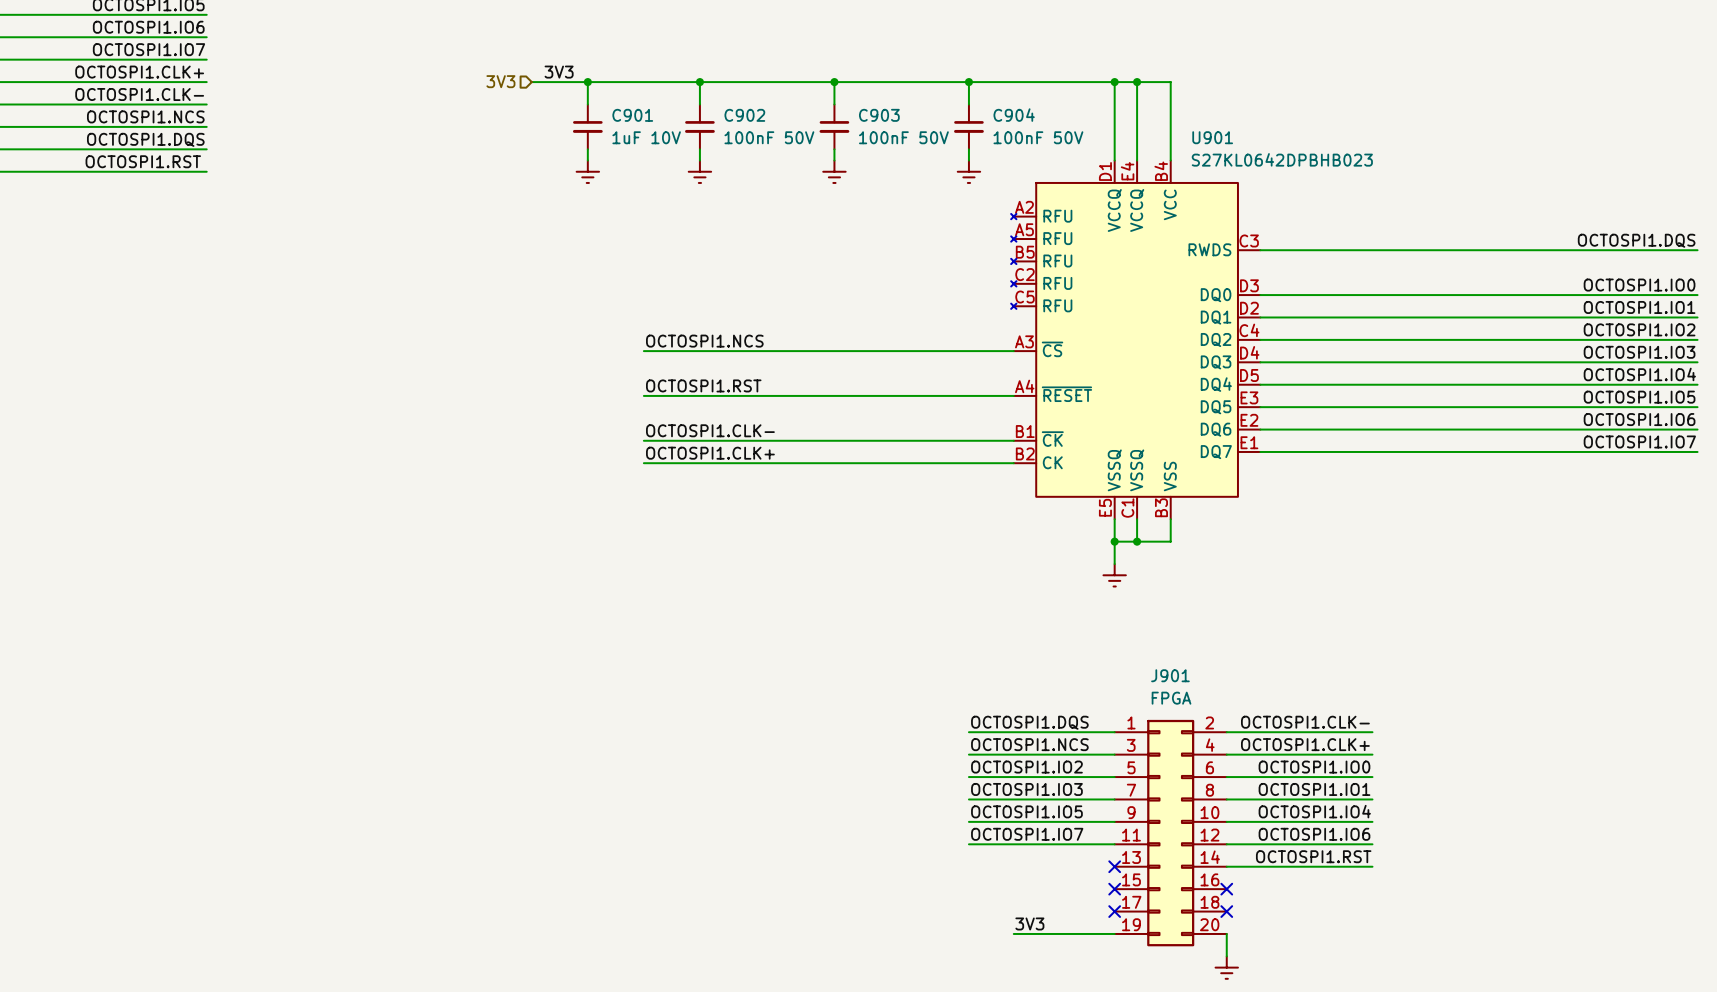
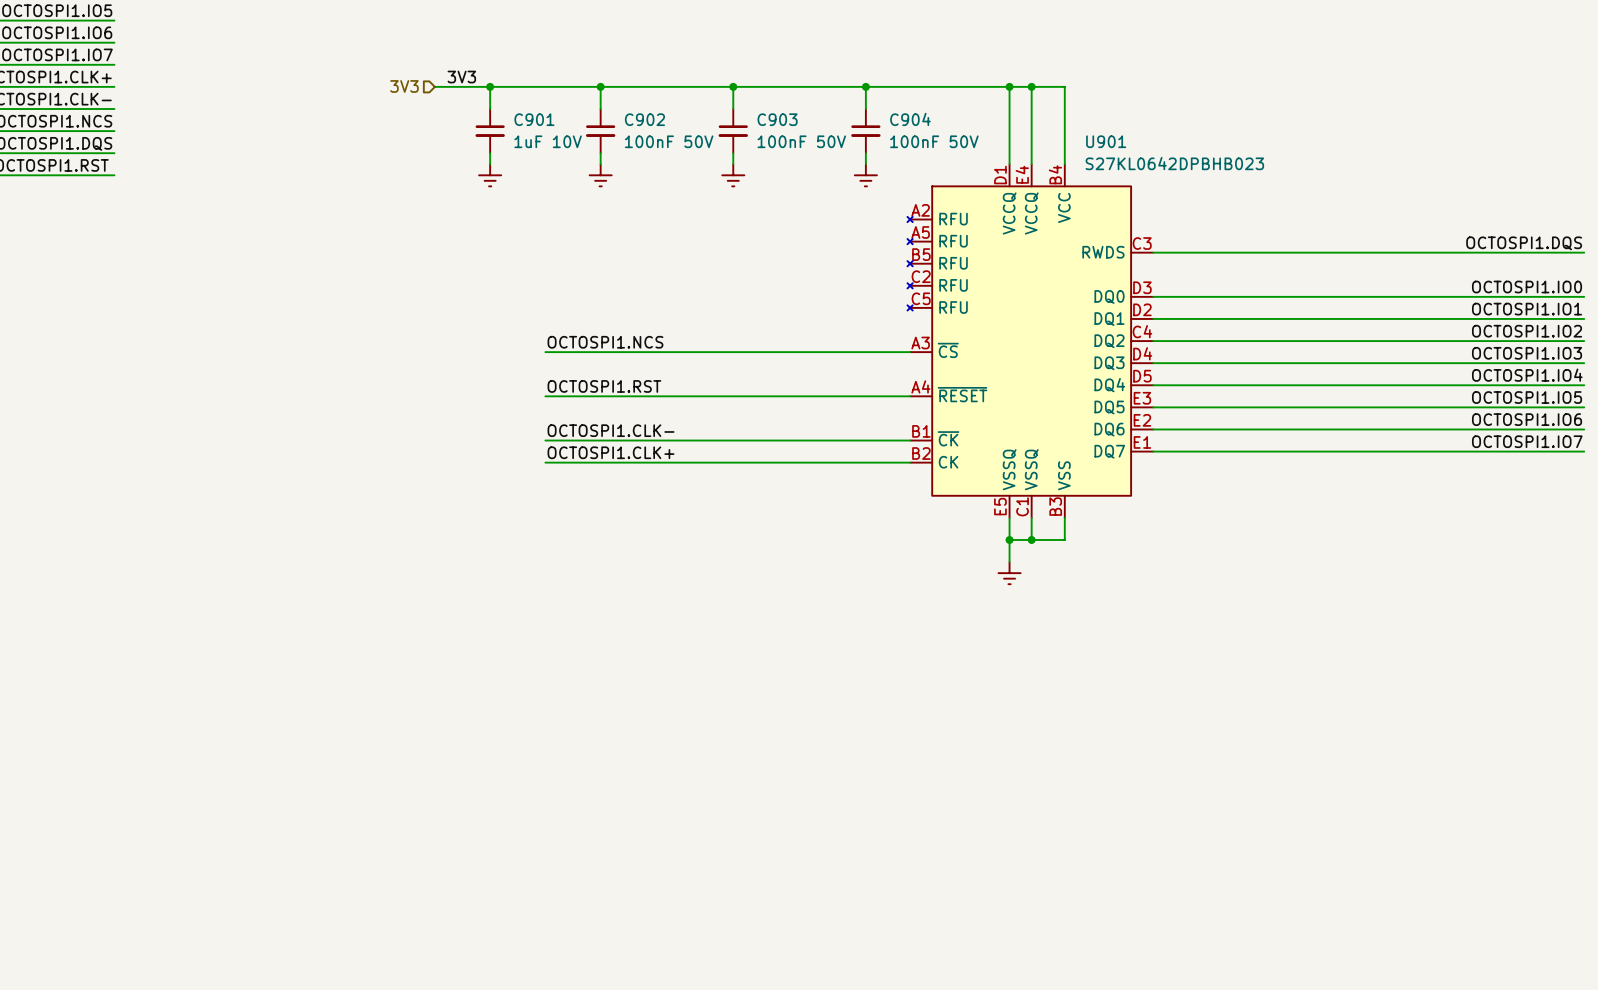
label: OCTOSPI1.DQS (1029, 722) -> none
label: OCTOSPI1.CLK- (1305, 722) -> none
wire: (968, 732) (1114, 732) -> none
wire: (1226, 732) (1372, 732) -> none
label: OCTOSPI1.NCS (1029, 744) -> none
label: OCTOSPI1.CLK+ (1305, 744) -> none
wire: (968, 754) (1114, 754) -> none
wire: (1226, 754) (1372, 754) -> none
label: OCTOSPI1.IO2 (1026, 767) -> none
label: OCTOSPI1.IO0 (1314, 767) -> none
wire: (968, 777) (1114, 777) -> none
wire: (1226, 777) (1372, 777) -> none
label: OCTOSPI1.IO3 (1026, 789) -> none
label: OCTOSPI1.IO1 (1314, 789) -> none
wire: (968, 799) (1114, 799) -> none
wire: (1226, 799) (1372, 799) -> none
label: OCTOSPI1.IO5 (1026, 811) -> none
label: OCTOSPI1.IO4 (1314, 811) -> none
wire: (968, 821) (1114, 821) -> none
wire: (1226, 821) (1372, 821) -> none
J901: FPGA (1170, 833) -> none
label: OCTOSPI1.IO7 (1027, 834) -> none
label: OCTOSPI1.IO6 (1314, 834) -> none
wire: (968, 844) (1114, 844) -> none
wire: (1226, 844) (1372, 844) -> none
label: OCTOSPI1.RST (1313, 856) -> none
no-connect mark: (1114, 866) -> none
wire: (1226, 866) (1372, 866) -> none
no-connect mark: (1114, 889) -> none
no-connect mark: (1226, 889) -> none
no-connect mark: (1114, 911) -> none
no-connect mark: (1226, 911) -> none
label: 3V3 (1029, 923) -> none
wire: (1013, 933) (1114, 933) -> none
wire: (1226, 933) (1226, 956) -> none
power symbol: (1226, 967) -> none

